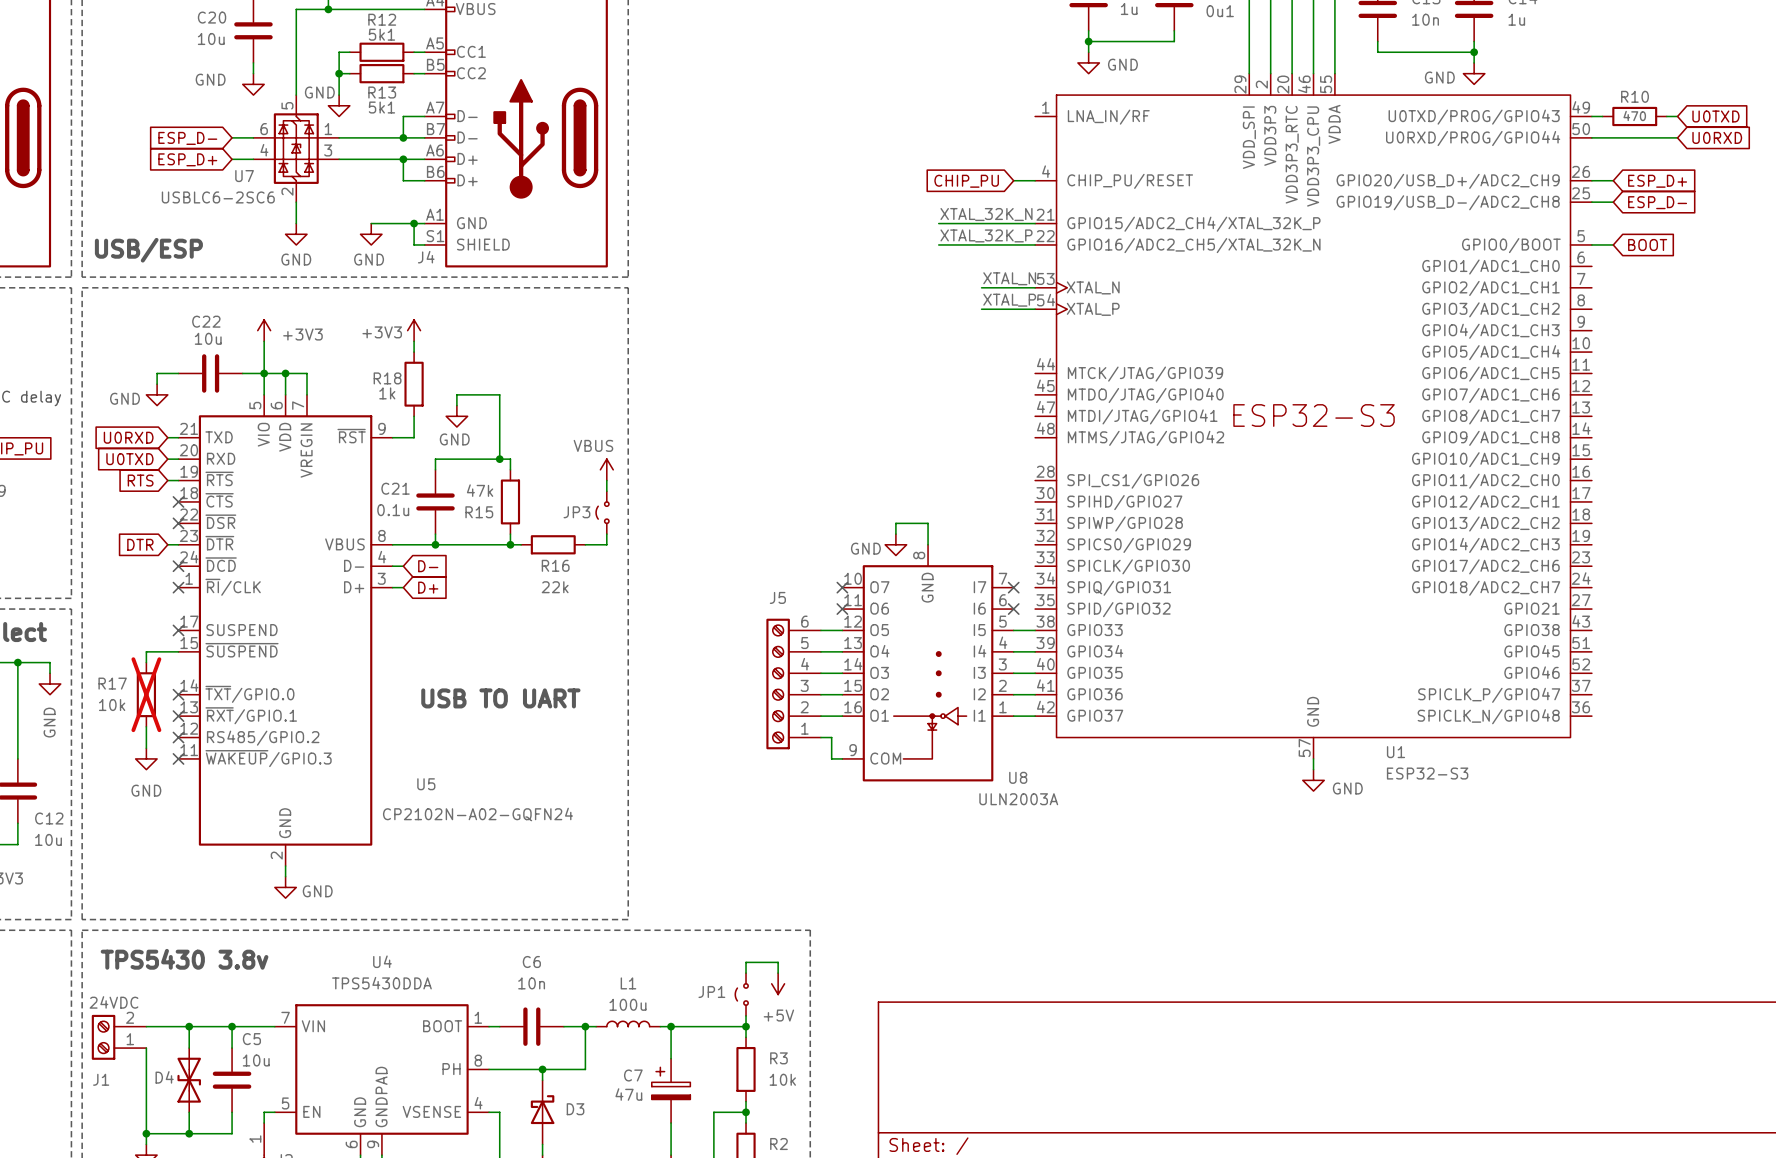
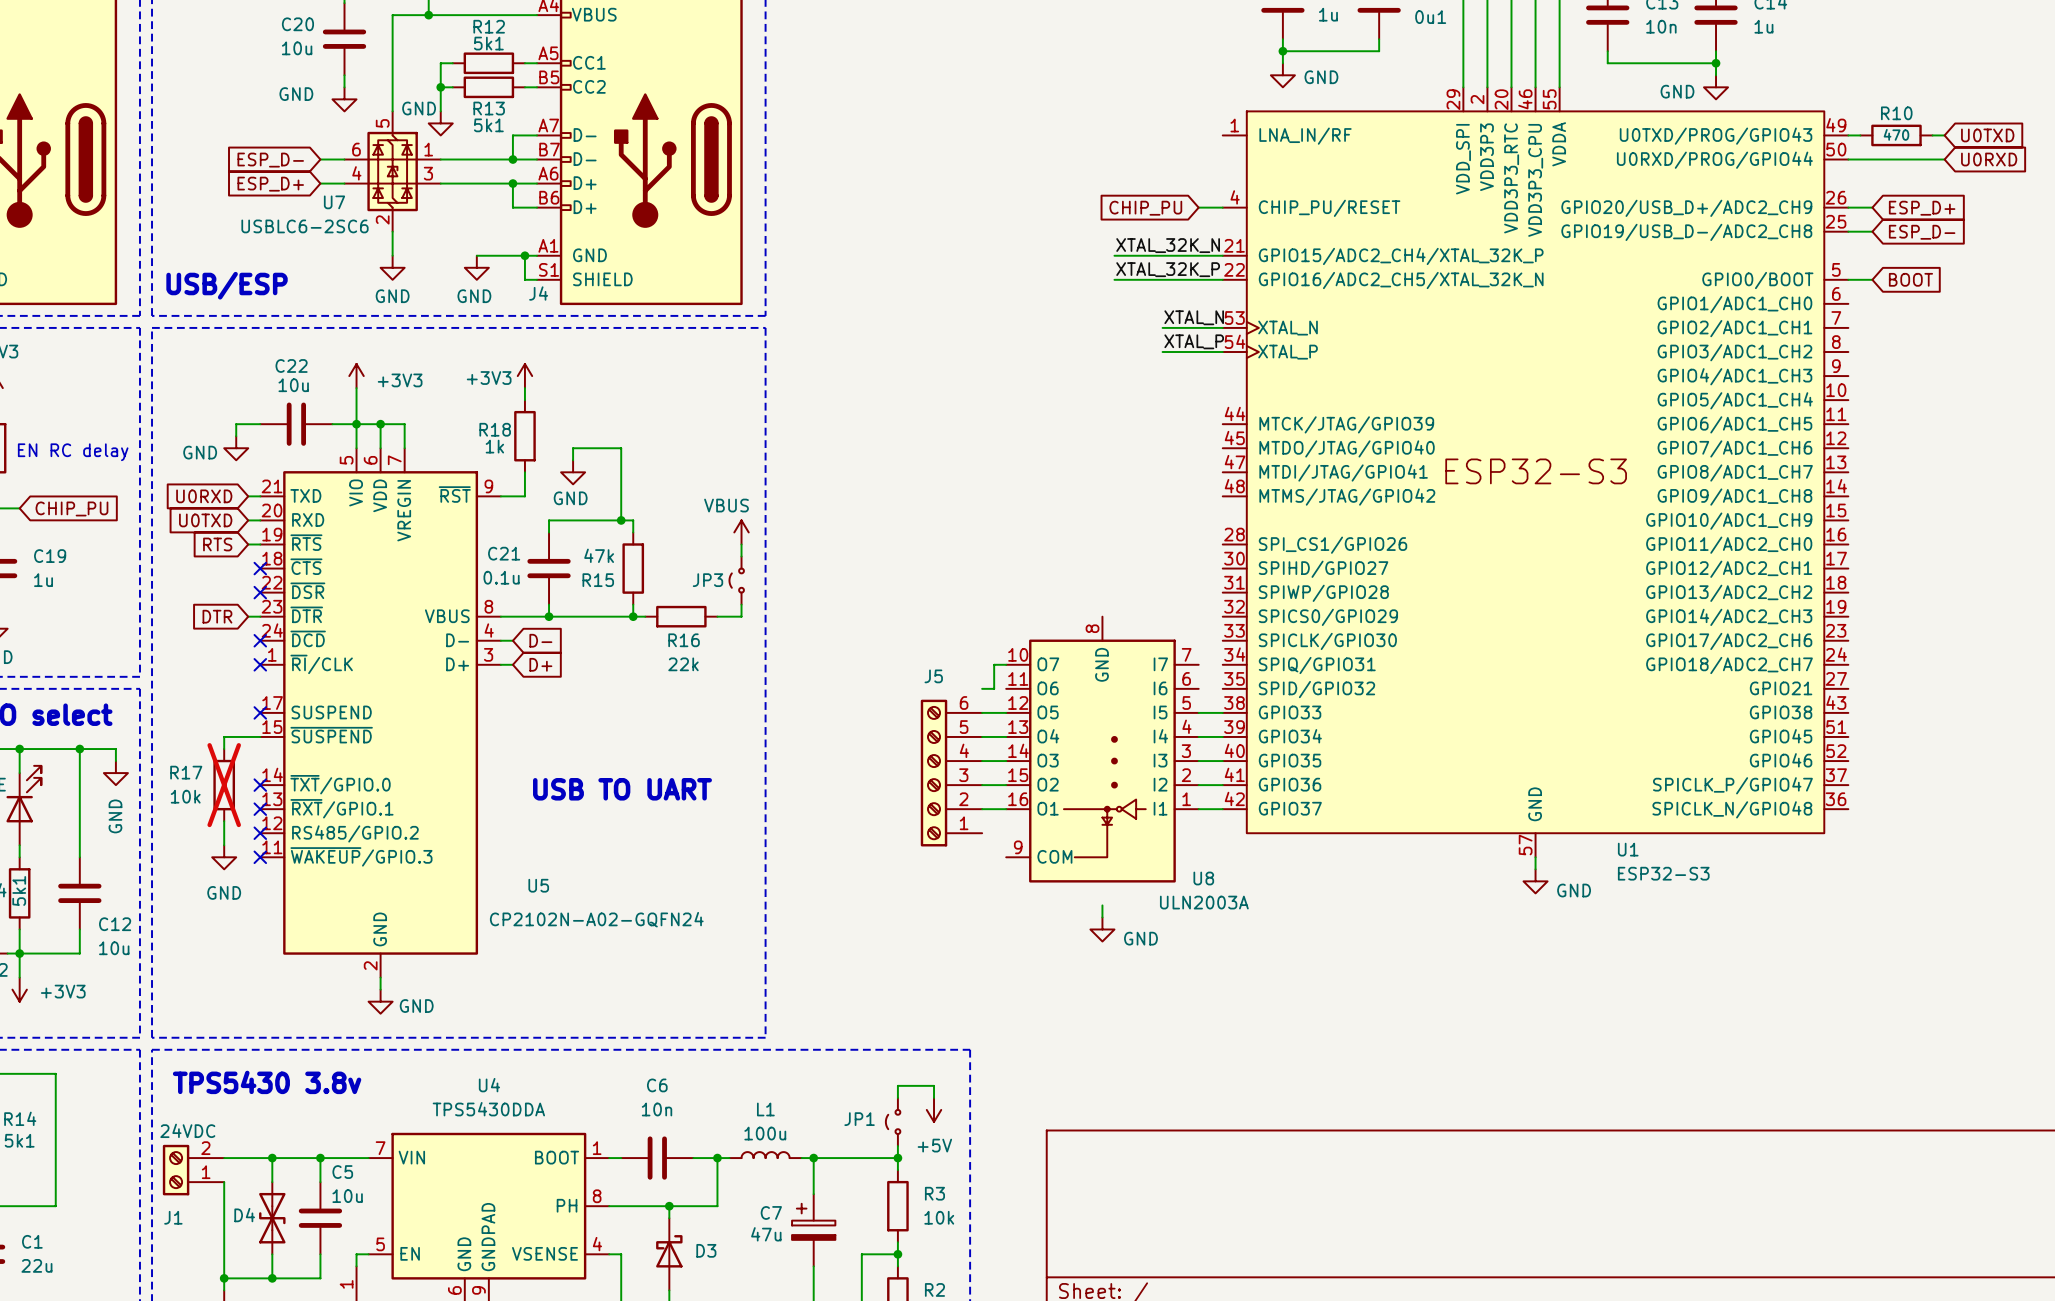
wire: (895, 534) (895, 523) (928, 523) (928, 544) -> none
power symbol: GND (895, 544) -> none
wire: none -> (1006, 664) (994, 664) (994, 688) (982, 688)
no-connect mark: (842, 587) -> none
no-connect mark: (1013, 587) -> none
no-connect mark: (842, 609) -> none
no-connect mark: (1013, 609) -> none
wire: (820, 737) (831, 737) (831, 758) (842, 758) -> none
wire: none -> (1102, 905) (1102, 917)
power symbol: none -> GND (1102, 929)

